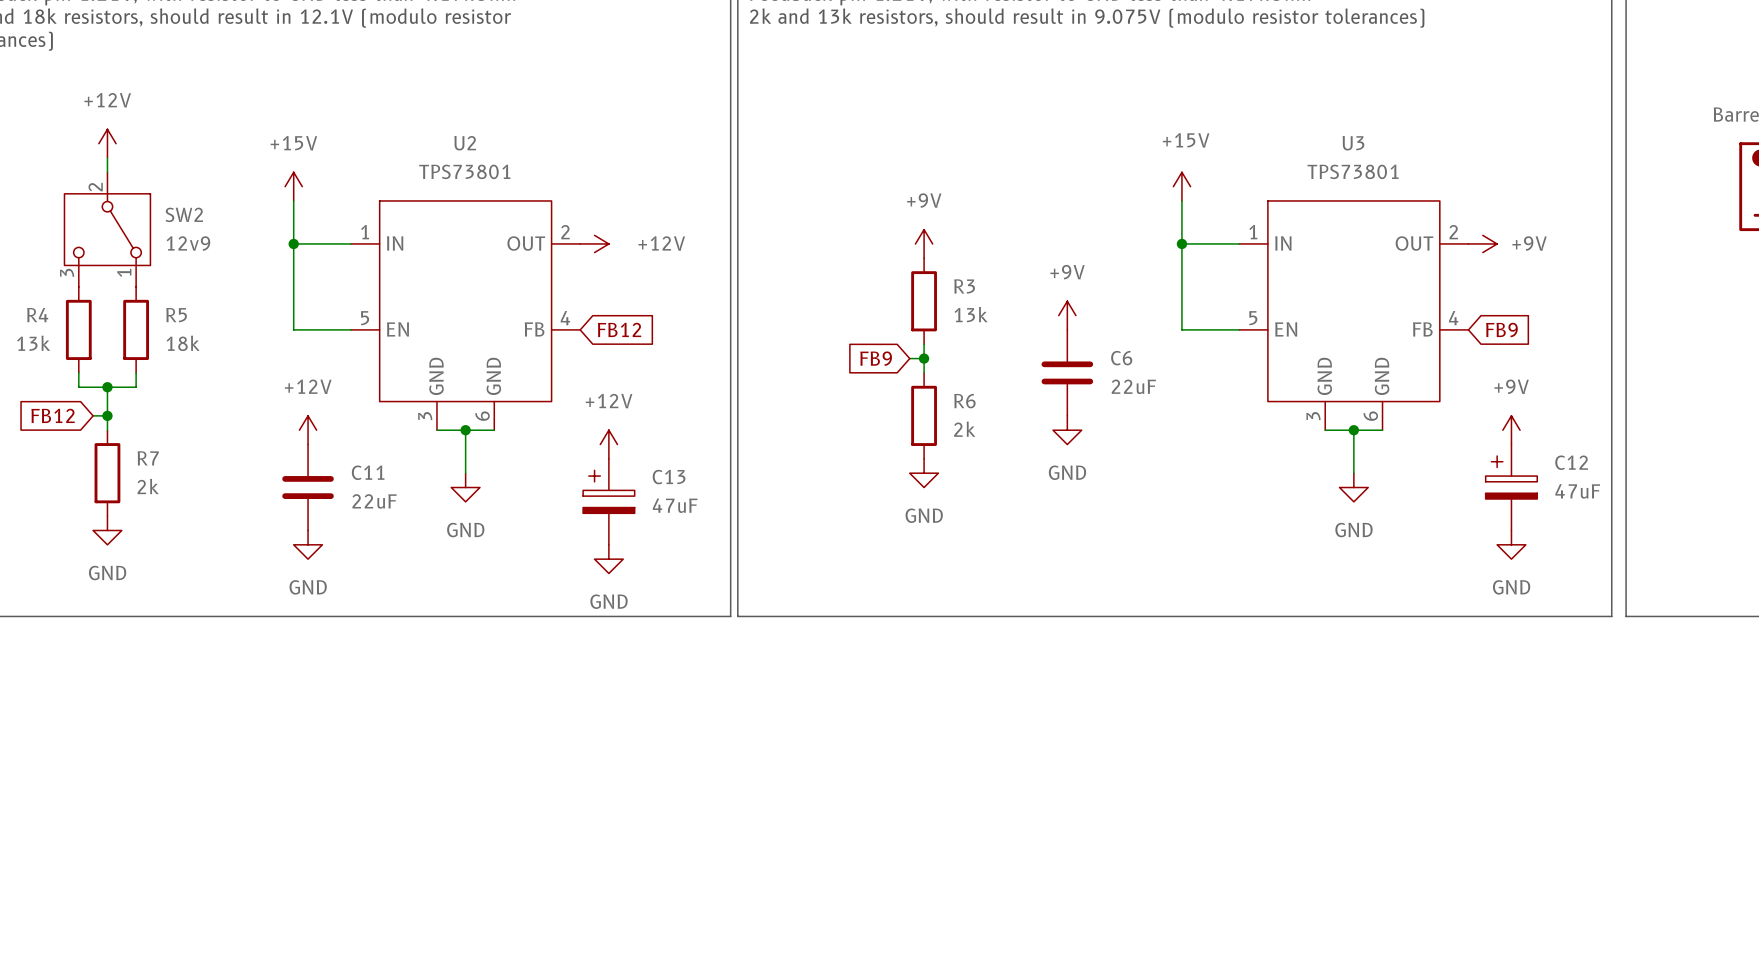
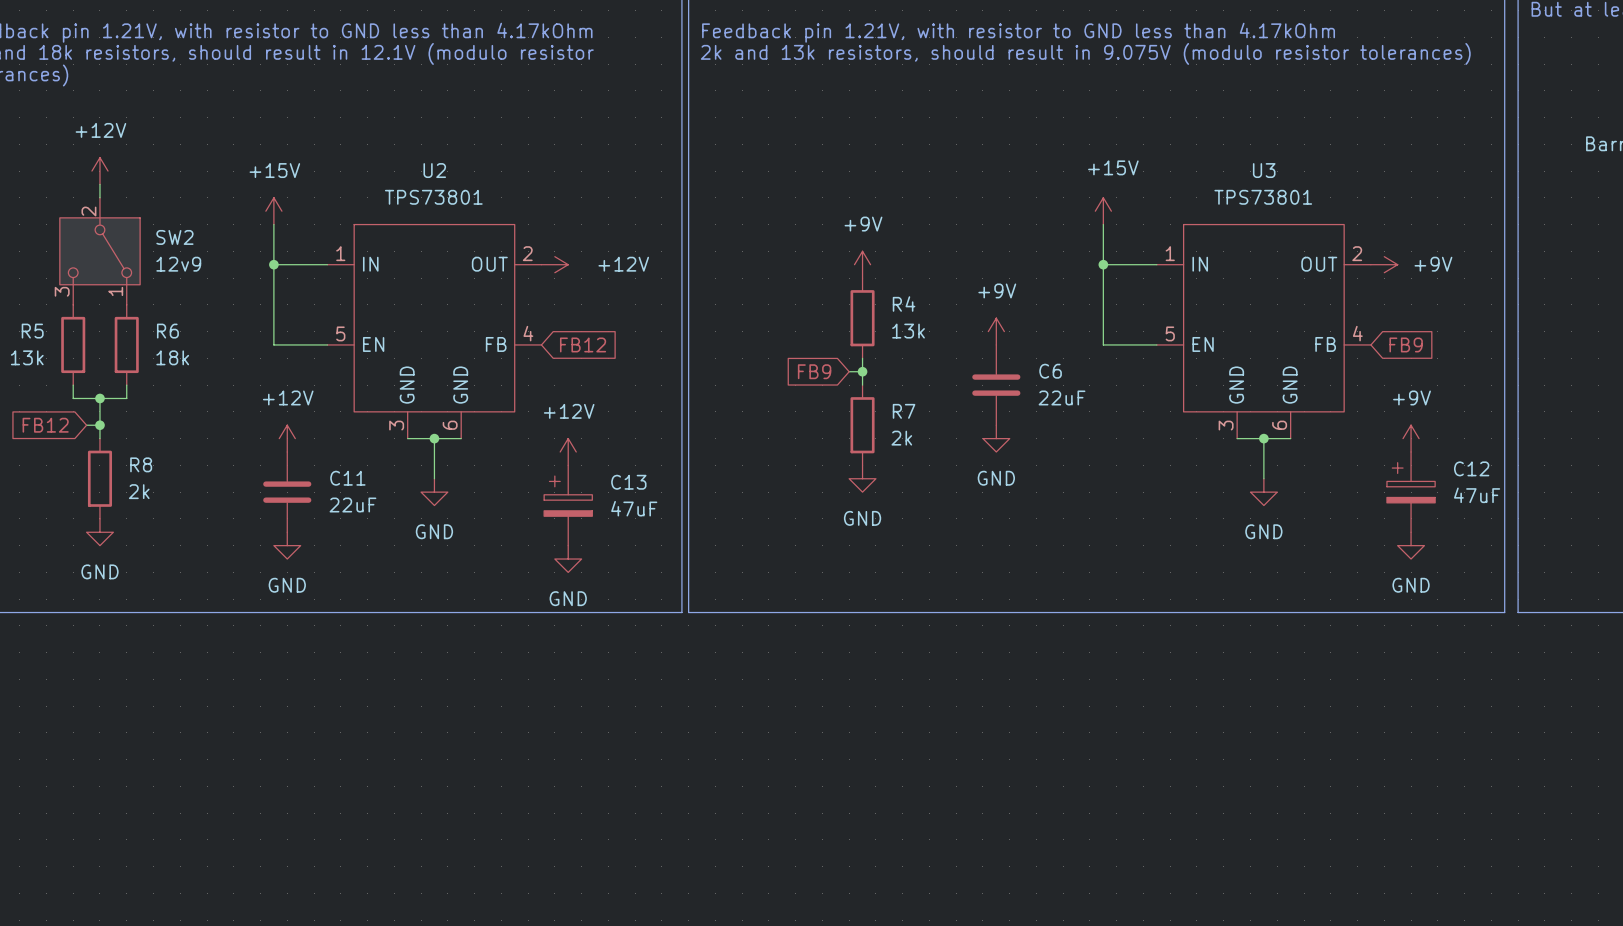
R3 name: R3 (964, 286) -> R4 (904, 304)
R4 name: R4 (37, 315) -> R5 (32, 331)
R5 name: R5 (176, 315) -> R6 (167, 331)
R6 name: R6 (964, 401) -> R7 (904, 411)
R7 name: R7 (148, 458) -> R8 (141, 464)

